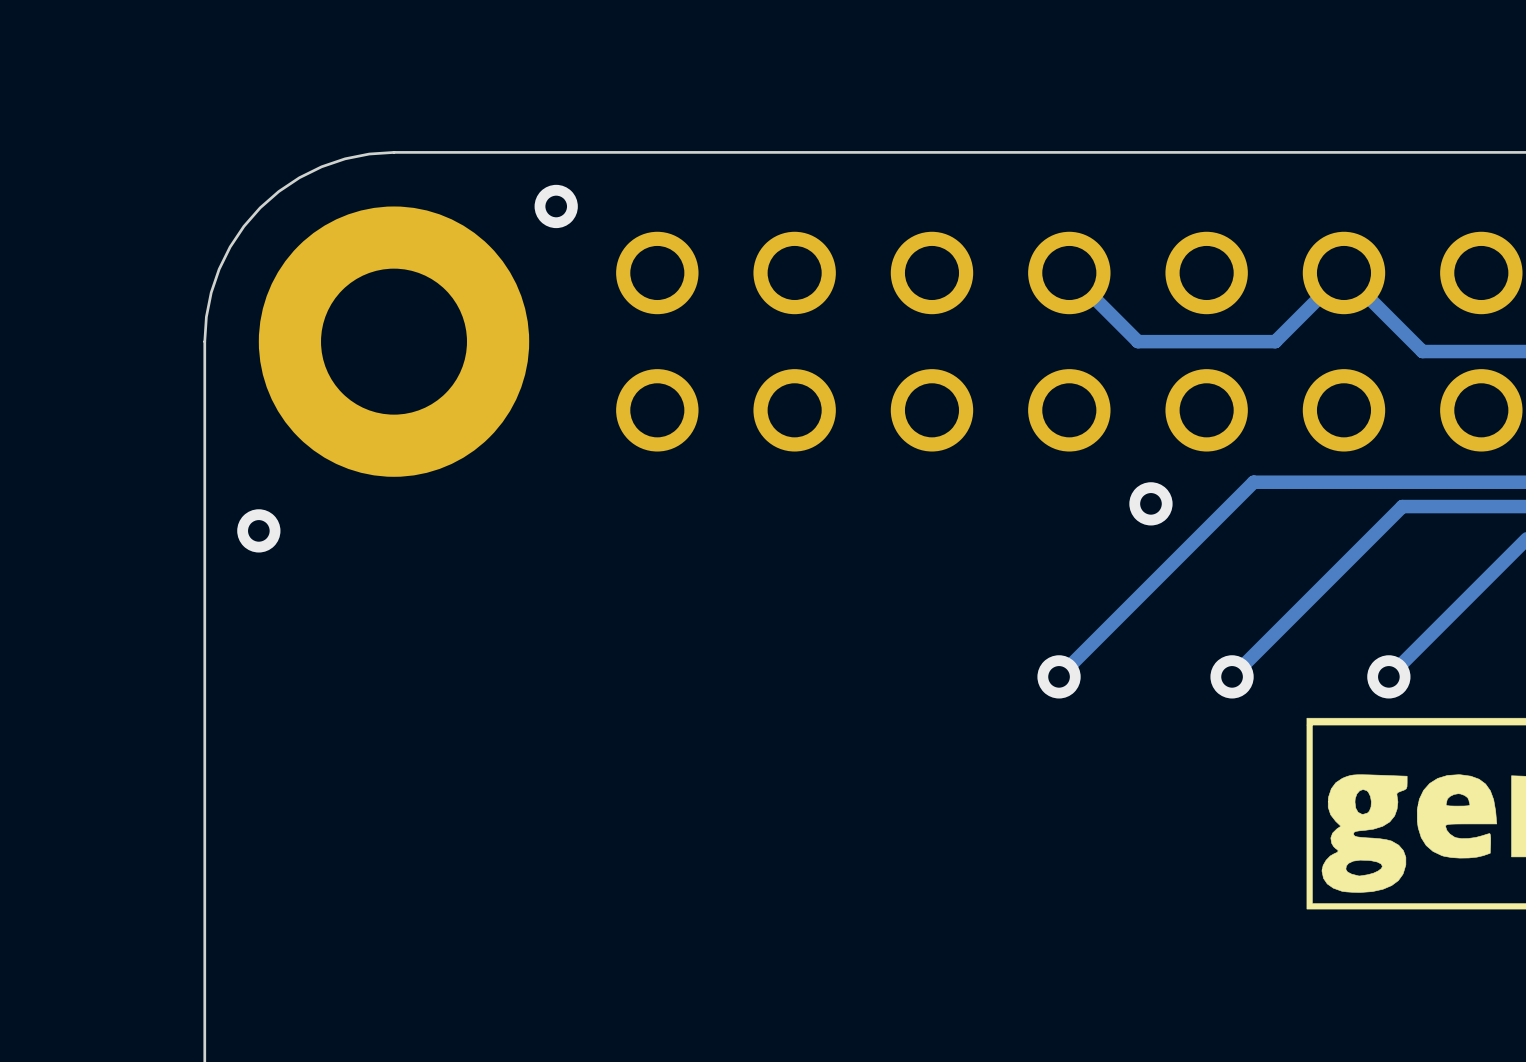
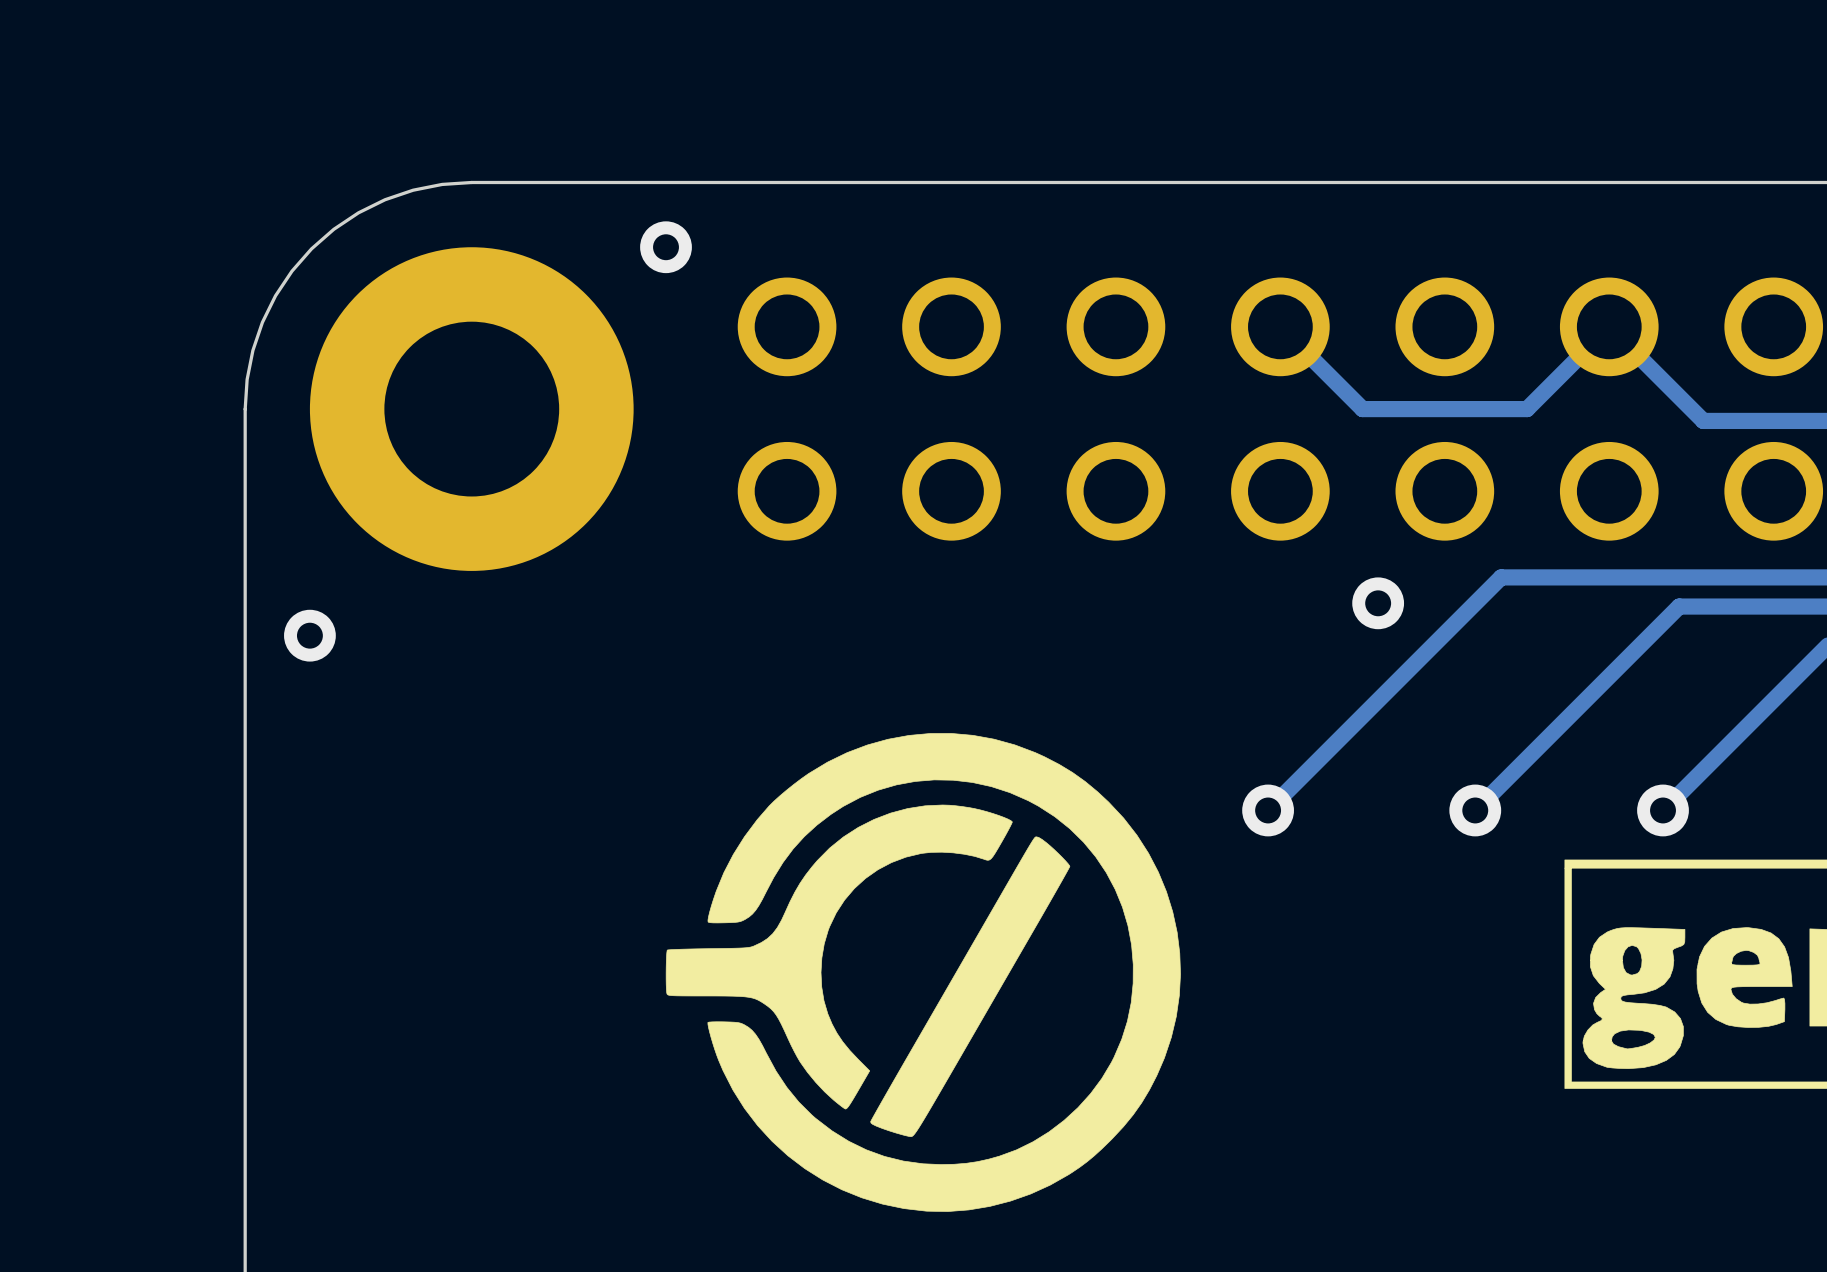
drawing: none -> [665, 733, 1181, 1212]

